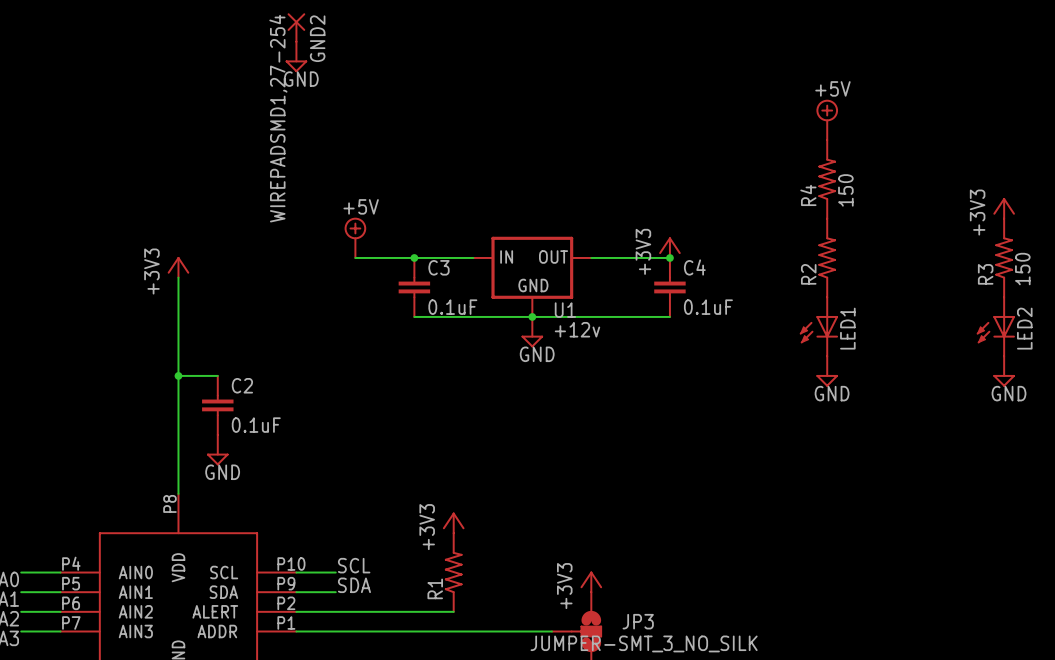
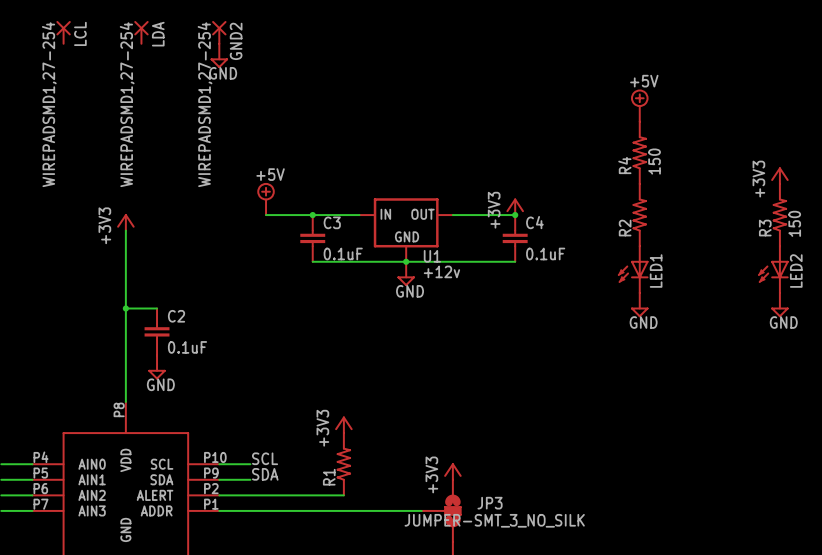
LCL: none -> WIREPADSMD1,27-254 (63, 32)
LDA: none -> WIREPADSMD1,27-254 (141, 32)

